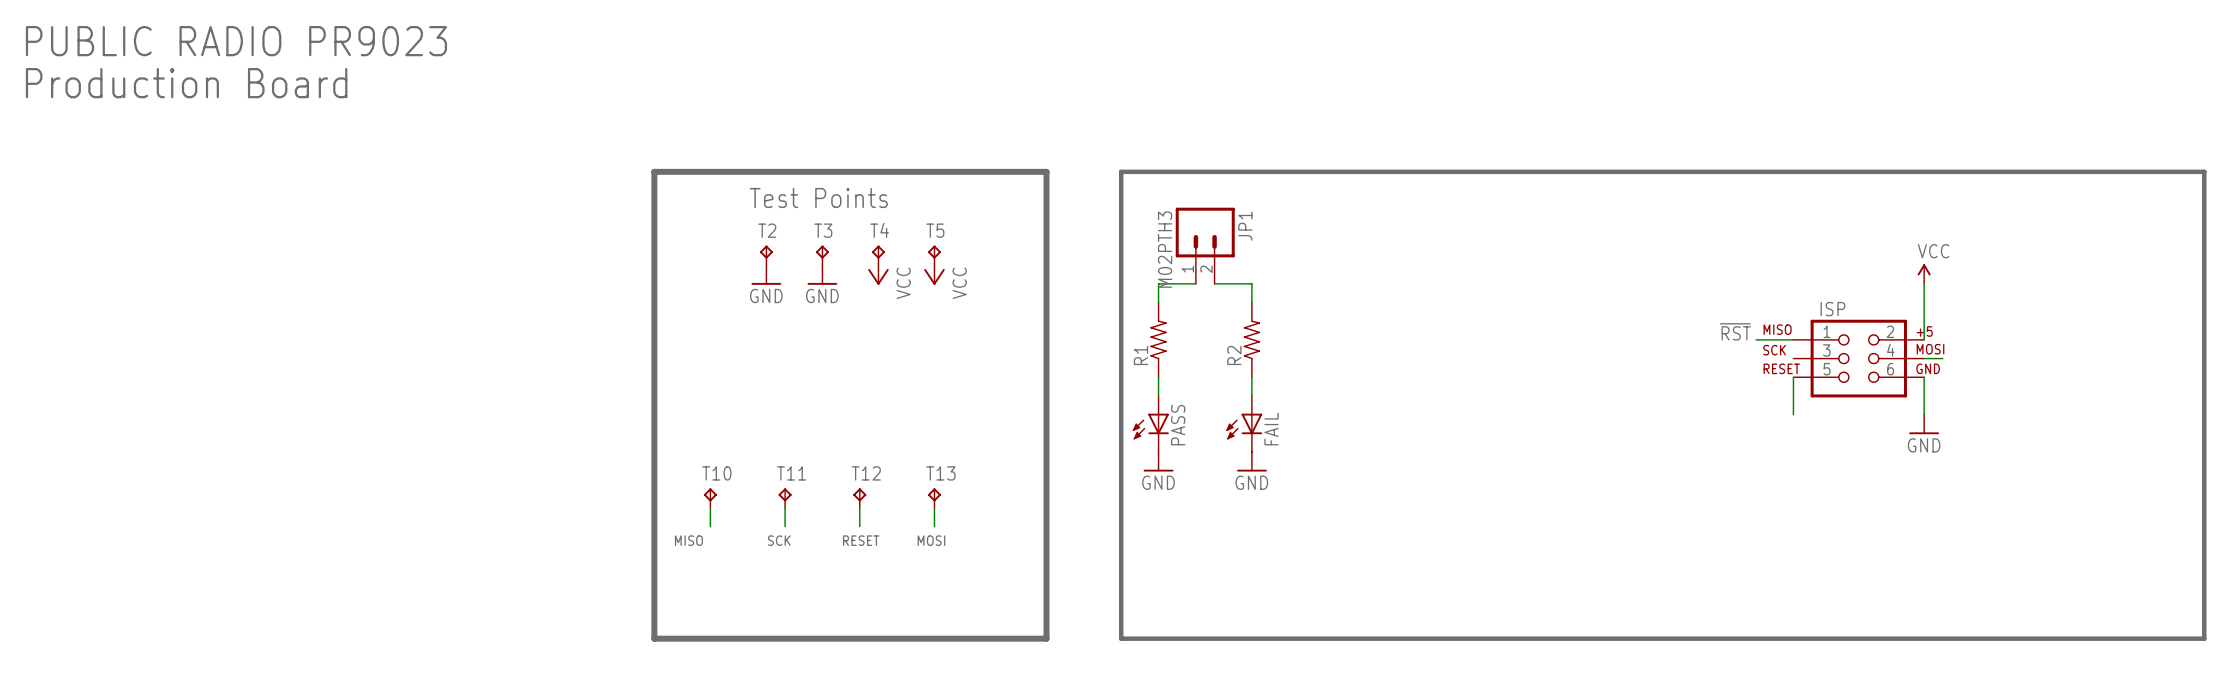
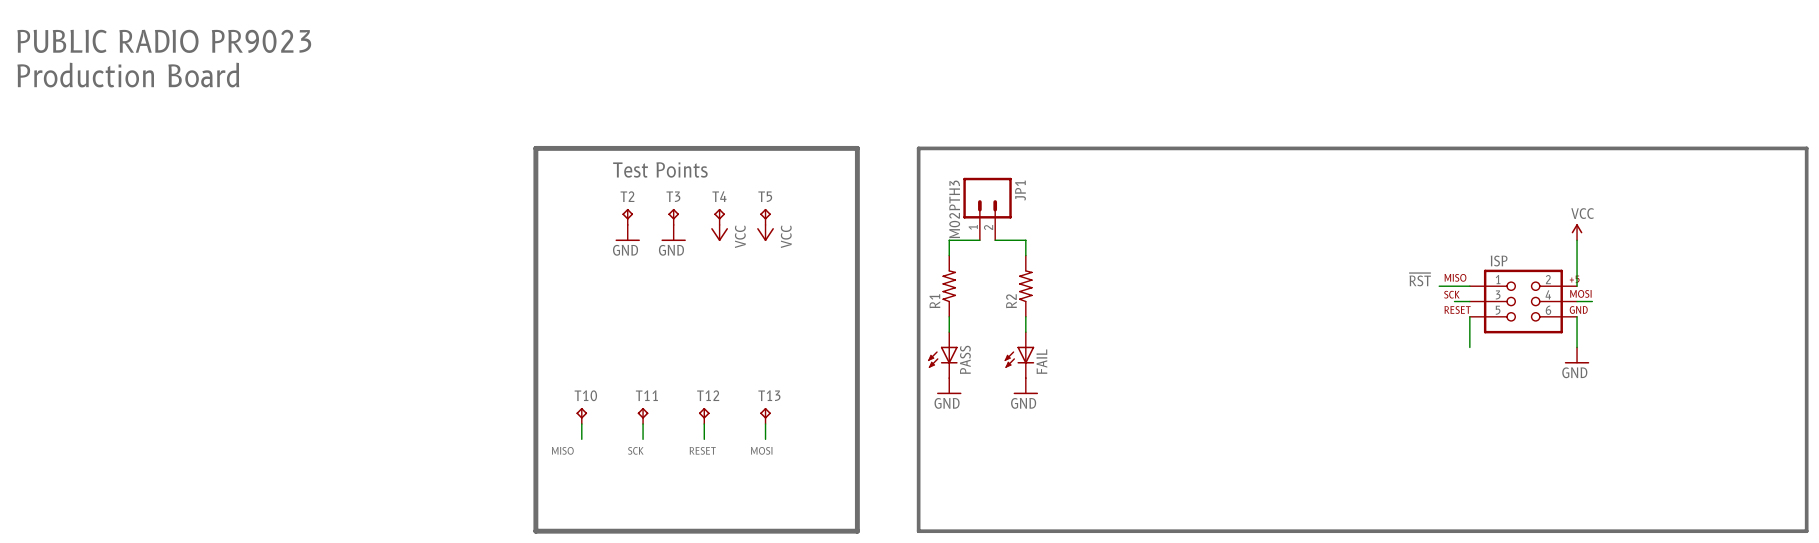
wire: none -> (1454, 301) (1469, 301)

